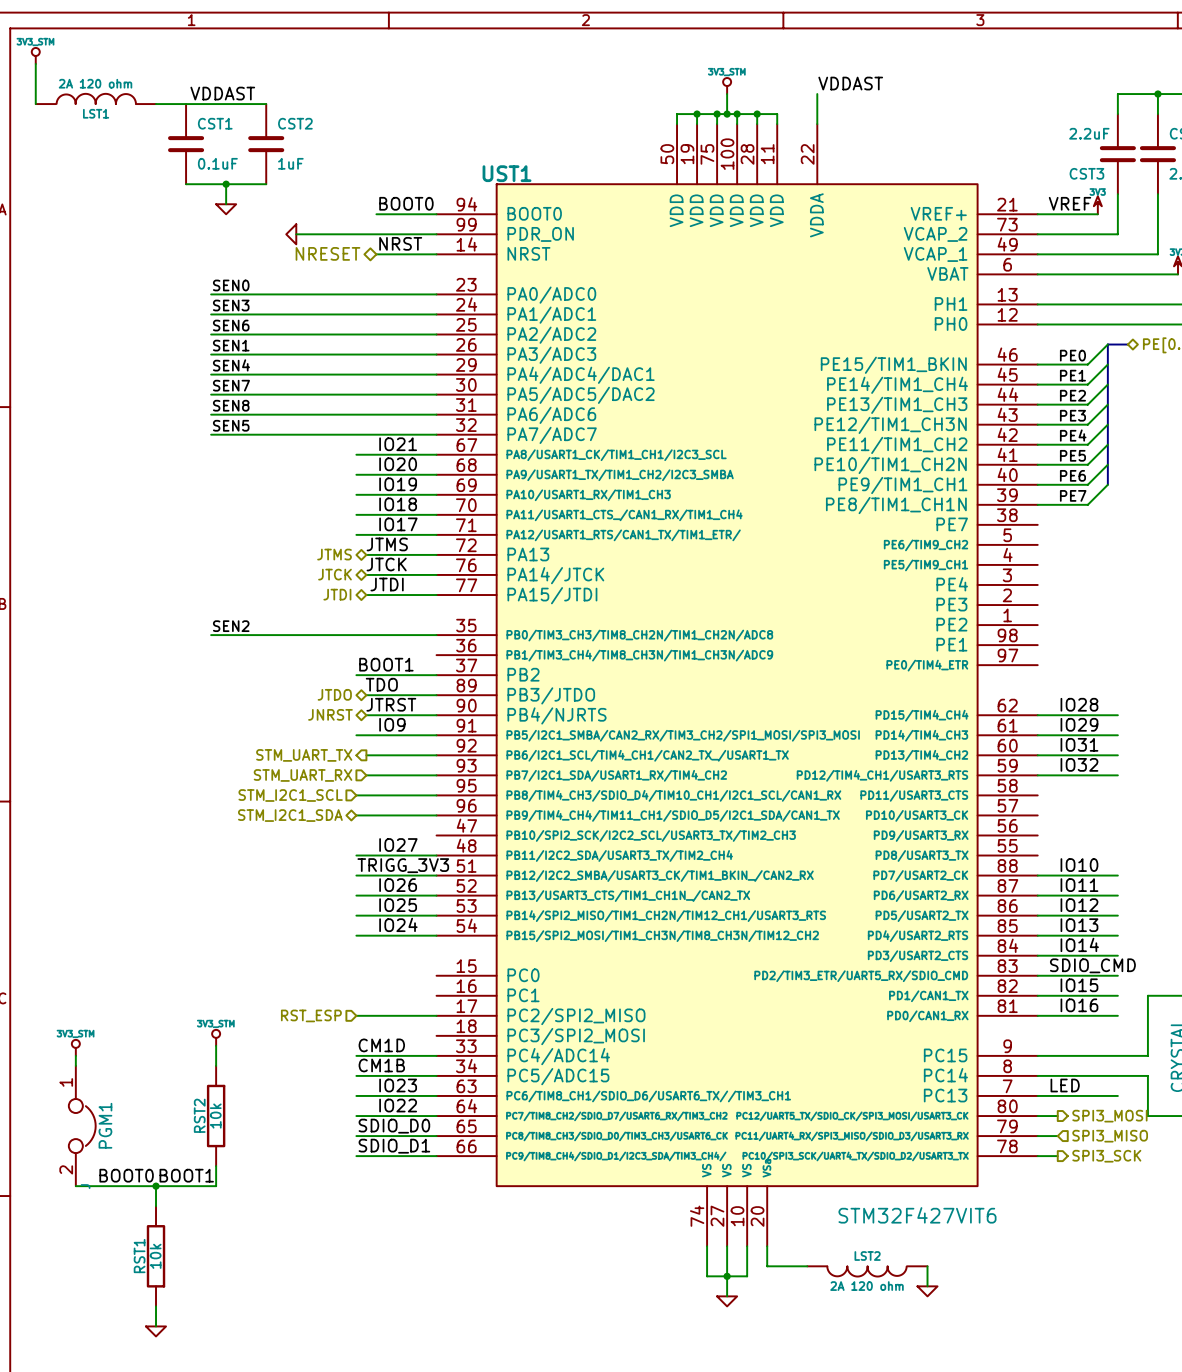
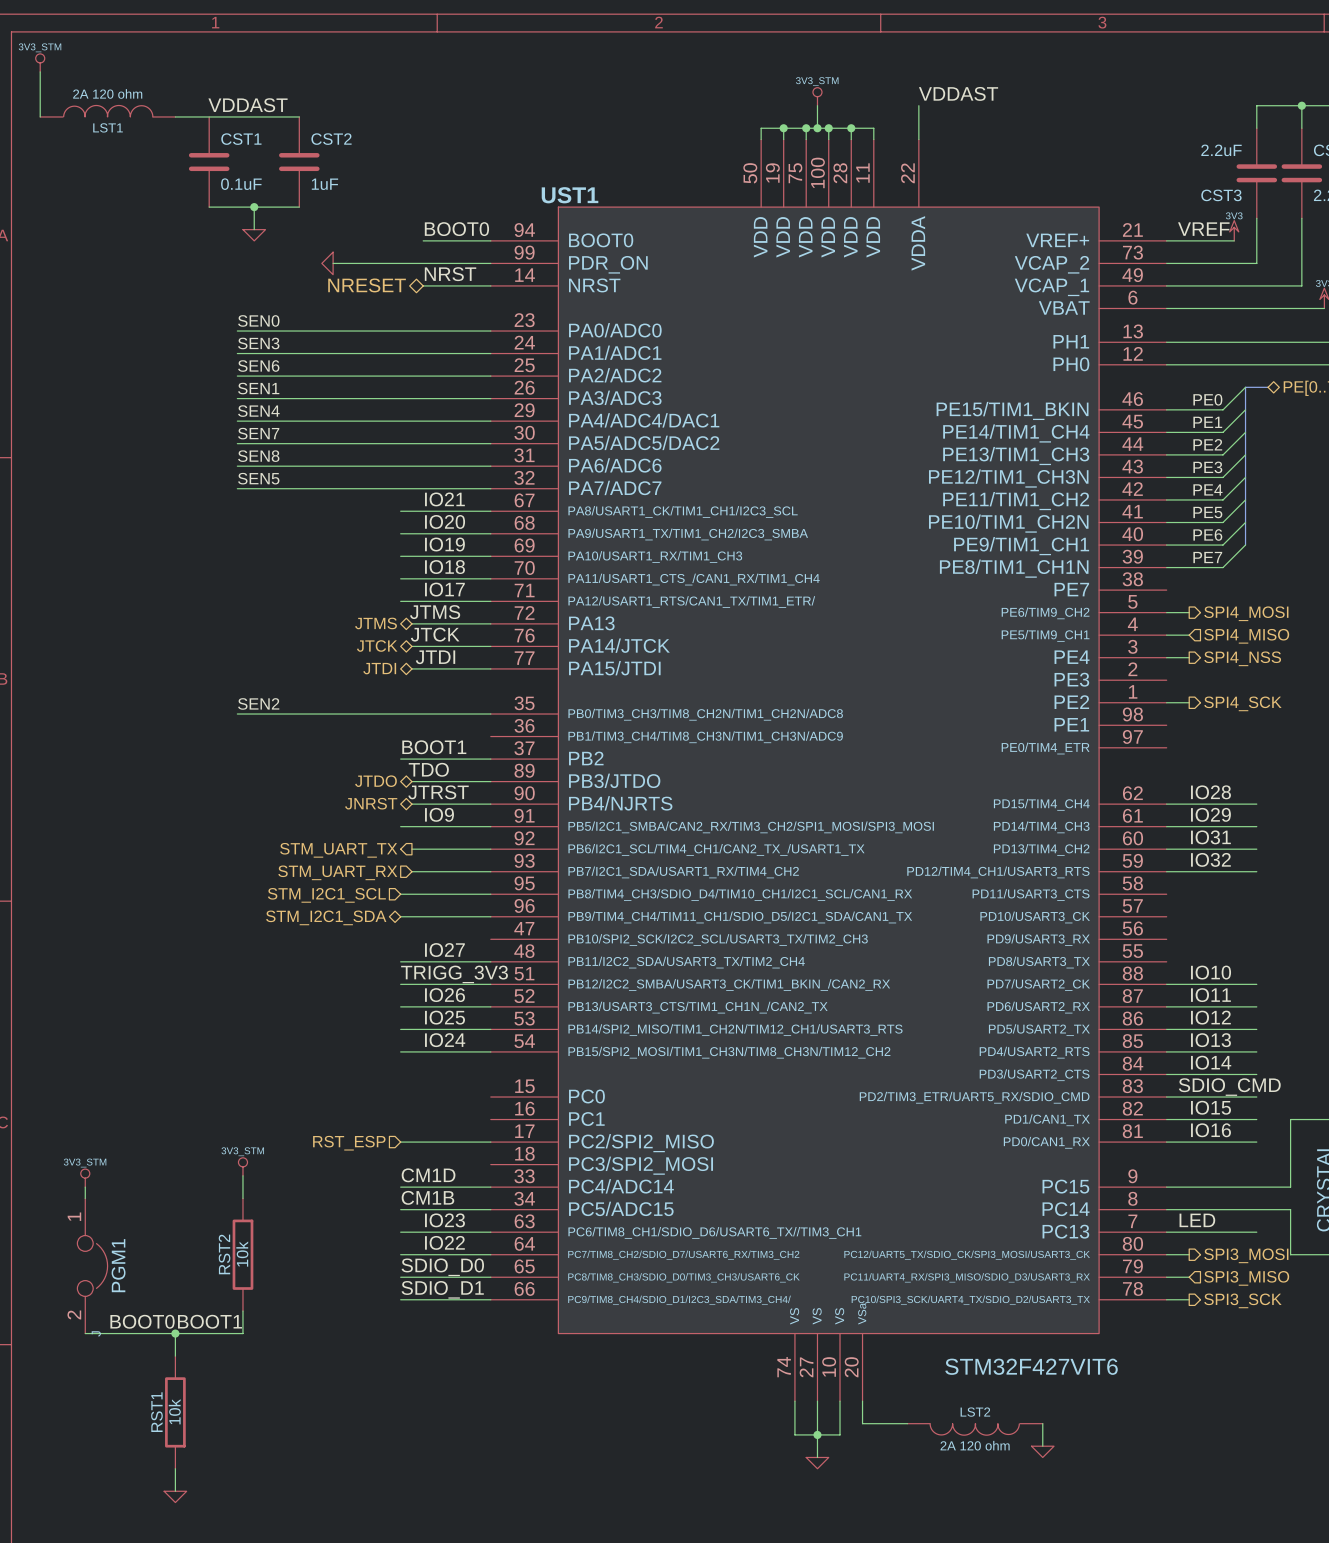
wire: none -> (1166, 612) (1189, 612)
hierarchical label: none -> SPI4_MOSI (1246, 613)
wire: none -> (1166, 635) (1189, 635)
hierarchical label: none -> SPI4_MISO (1246, 636)
wire: none -> (1166, 657) (1189, 657)
hierarchical label: none -> SPI4_NSS (1242, 658)
hierarchical label: none -> SPI4_SCK (1242, 703)
wire: none -> (1166, 702) (1189, 702)

